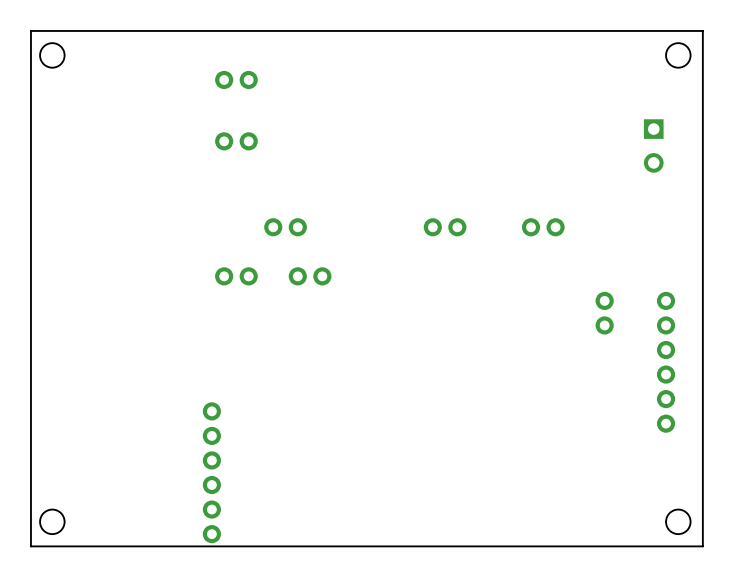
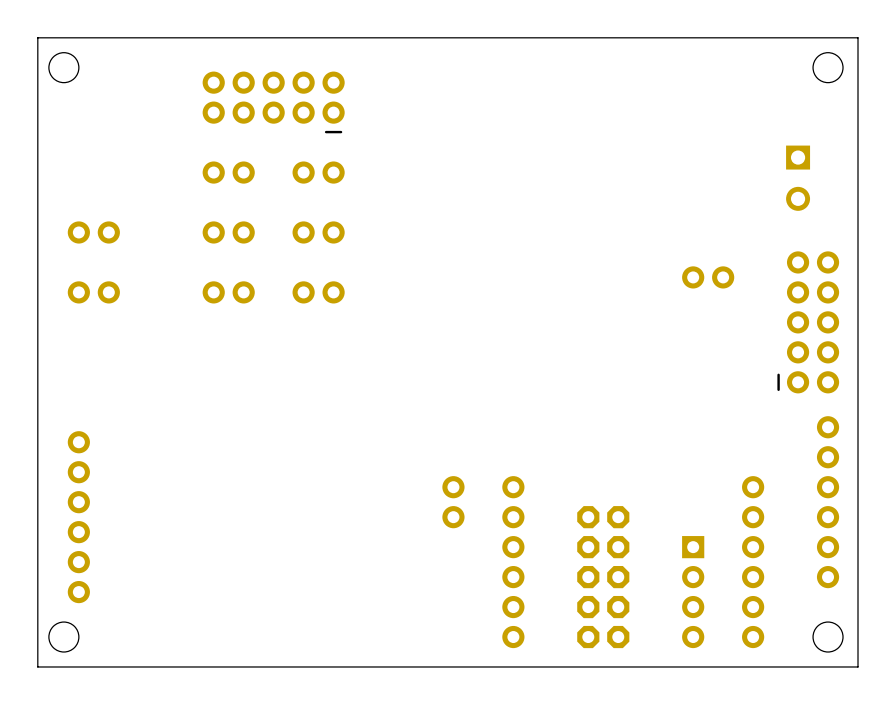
part: (236, 79) -> none
part: none -> (273, 102)
part: none -> (228, 172)
part: (236, 141) -> none
part: none -> (318, 172)
part: none -> (93, 232)
part: none -> (228, 232)
part: none -> (318, 232)
part: (285, 227) -> none
part: (445, 227) -> none
part position: (543, 227) -> (708, 277)
part: none -> (93, 292)
part: none -> (228, 292)
part: none -> (318, 292)
part: none -> (808, 322)
part: (236, 276) -> none
part: (310, 276) -> none
part: (604, 313) -> none
part position: (666, 362) -> (828, 502)
part: none -> (453, 502)
part: none -> (78, 517)
part: none -> (513, 562)
part: none -> (753, 562)
part: (211, 472) -> none
part: none -> (603, 577)
part: none -> (693, 592)

